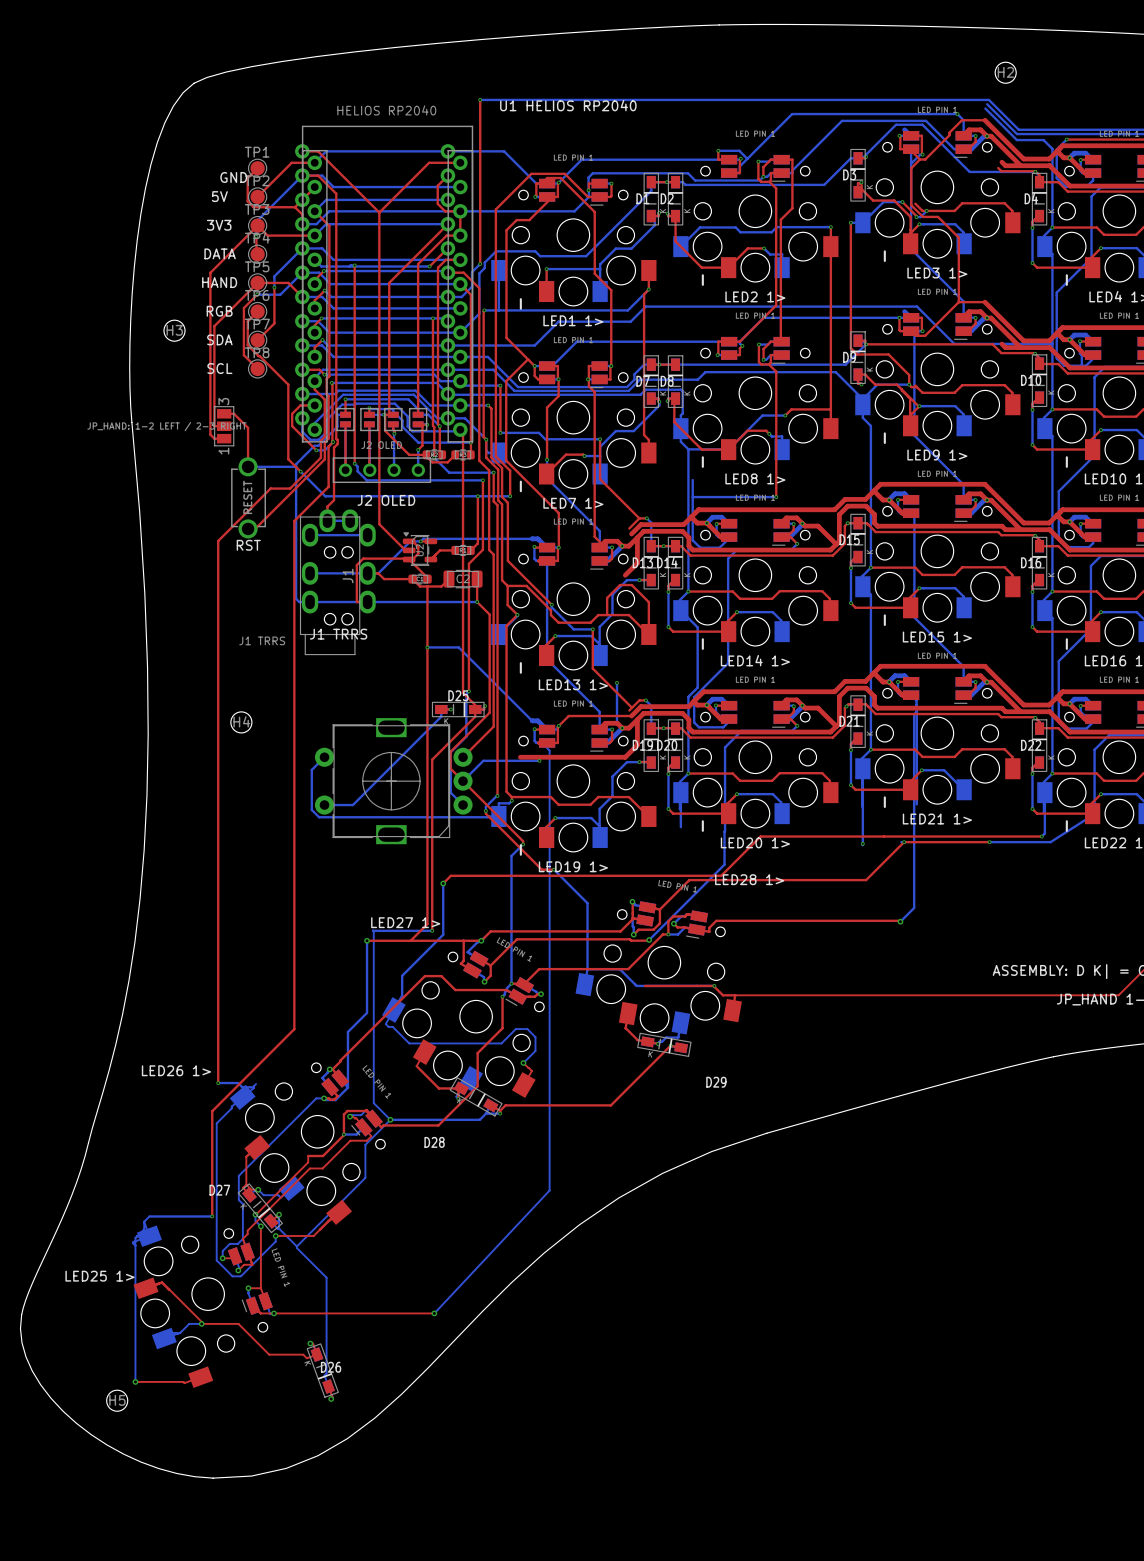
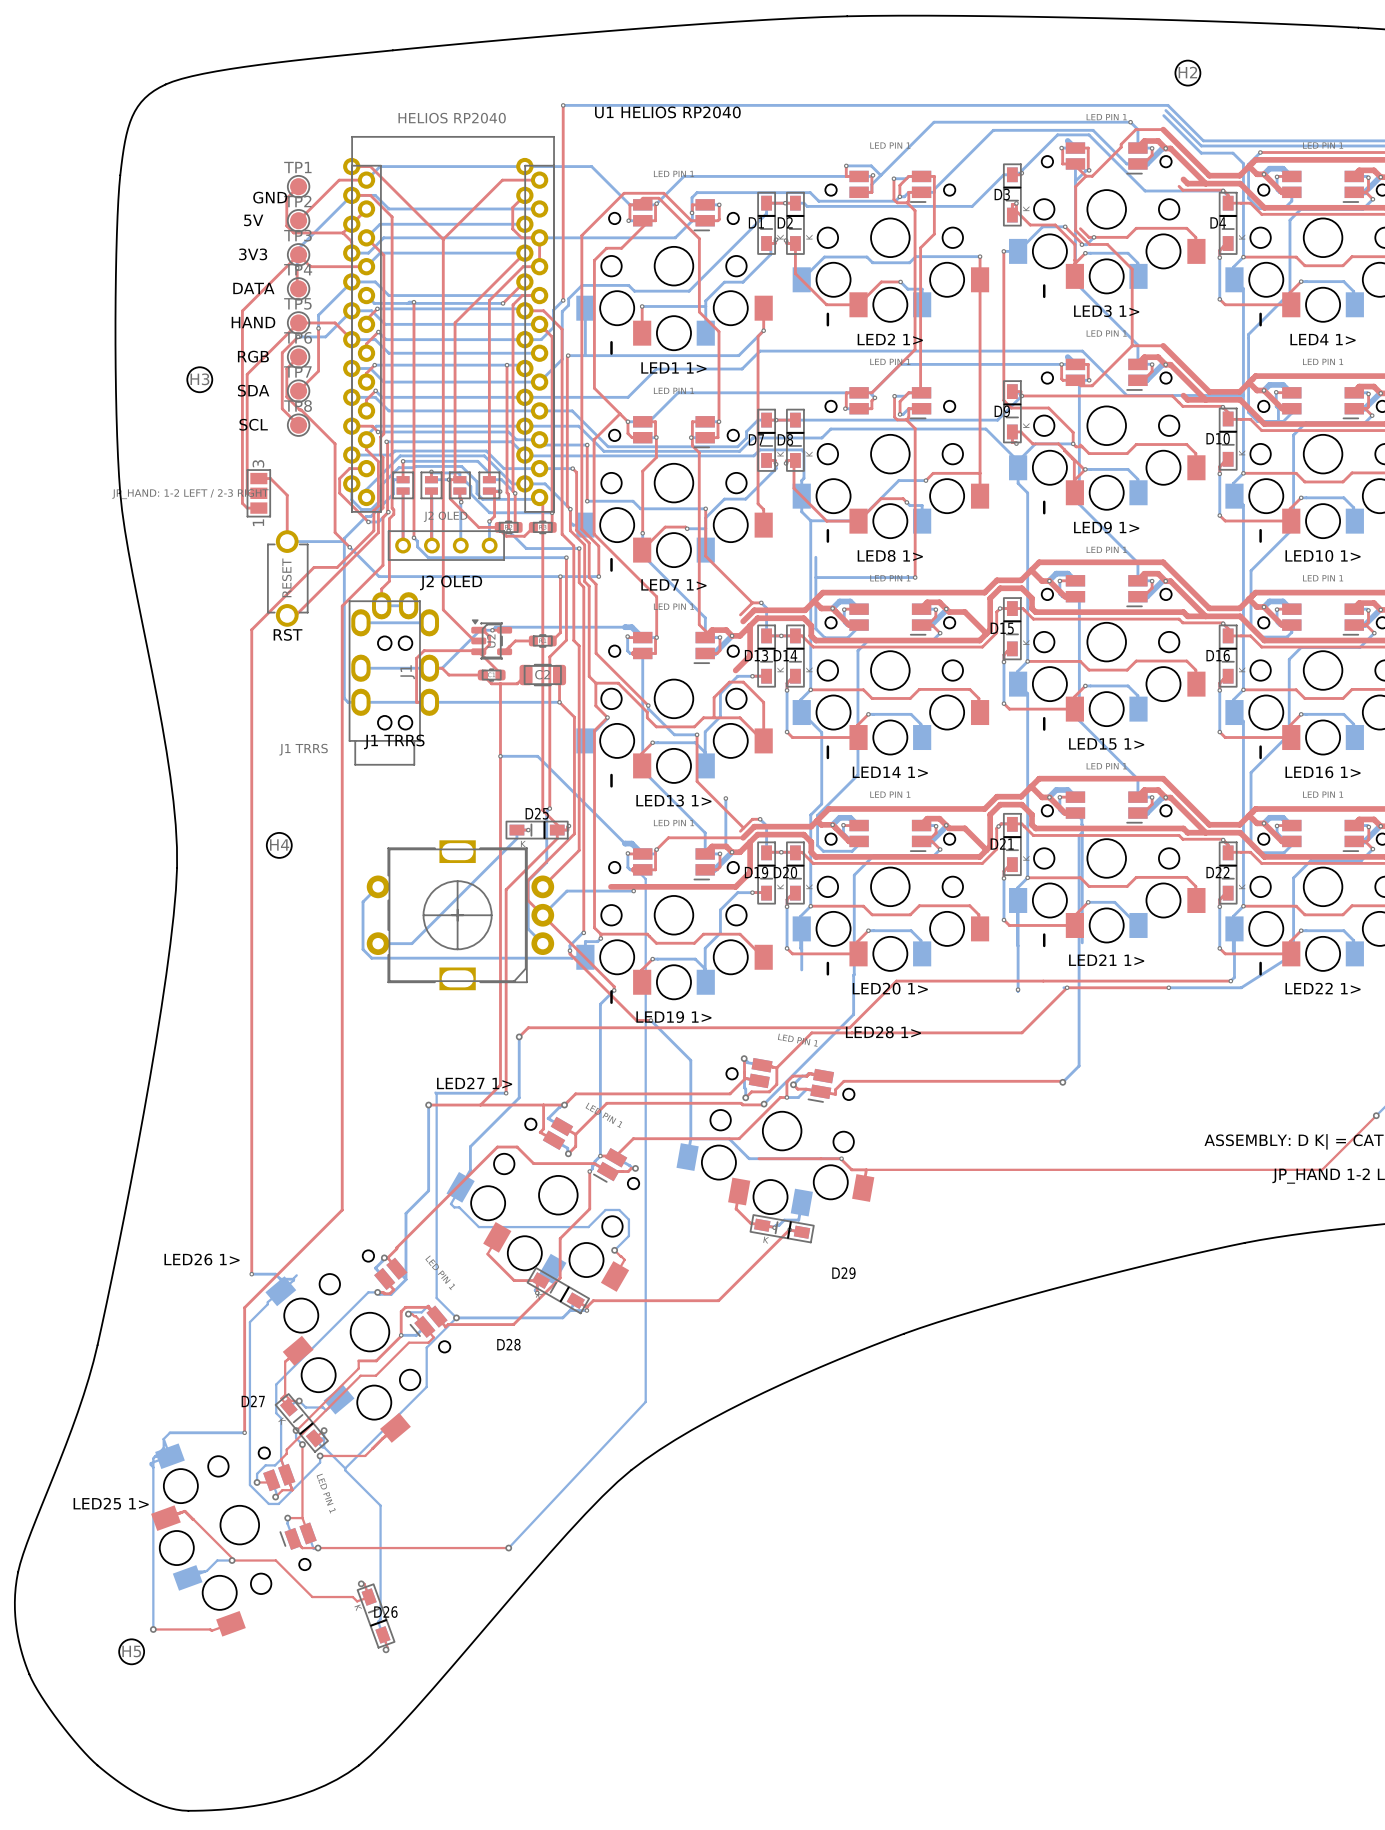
board edge: (719, 24) (479, 39) (354, 51) (282, 61) (206, 77) (193, 83) (183, 92) (173, 106) (157, 142) (145, 188) (137, 240) (130, 319) (130, 407) (139, 511) (147, 667) (146, 795) (140, 898) (122, 1014) (85, 1156) (66, 1207) (23, 1307) (20, 1328) (26, 1357) (40, 1384) (62, 1411) (106, 1444) (140, 1462) (176, 1473) (213, 1478) (251, 1476) (286, 1468) (318, 1455) (347, 1438) (374, 1418) (401, 1394) (482, 1311) (544, 1253) (579, 1224) (618, 1197) (662, 1173) (711, 1151) (766, 1133) (948, 1082) (1053, 1056) -> (847, 16) (737, 21) (574, 33) (260, 64) (203, 73) (172, 81) (149, 94) (134, 111) (128, 128) (123, 149) (117, 216) (115, 344) (118, 456) (124, 529) (170, 776) (176, 847) (175, 890) (166, 975) (149, 1077) (124, 1216) (97, 1345) (77, 1411) (26, 1543) (18, 1572) (15, 1594) (15, 1616) (19, 1642) (25, 1664) (34, 1684) (45, 1702) (84, 1752) (115, 1779) (150, 1800) (175, 1809) (211, 1810) (253, 1806) (301, 1794) (336, 1779) (370, 1755) (415, 1708) (549, 1553) (602, 1496) (644, 1459) (691, 1430) (745, 1401) (801, 1375) (919, 1328) (1073, 1283) (1244, 1242)

